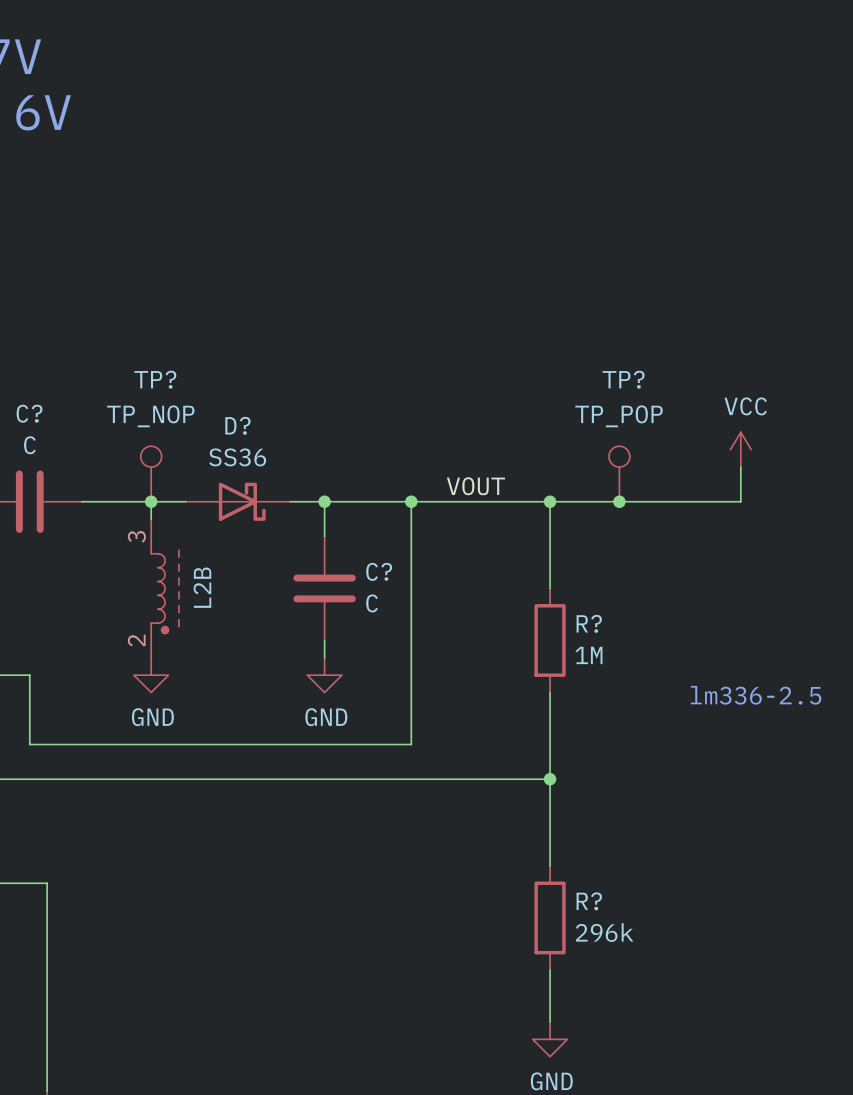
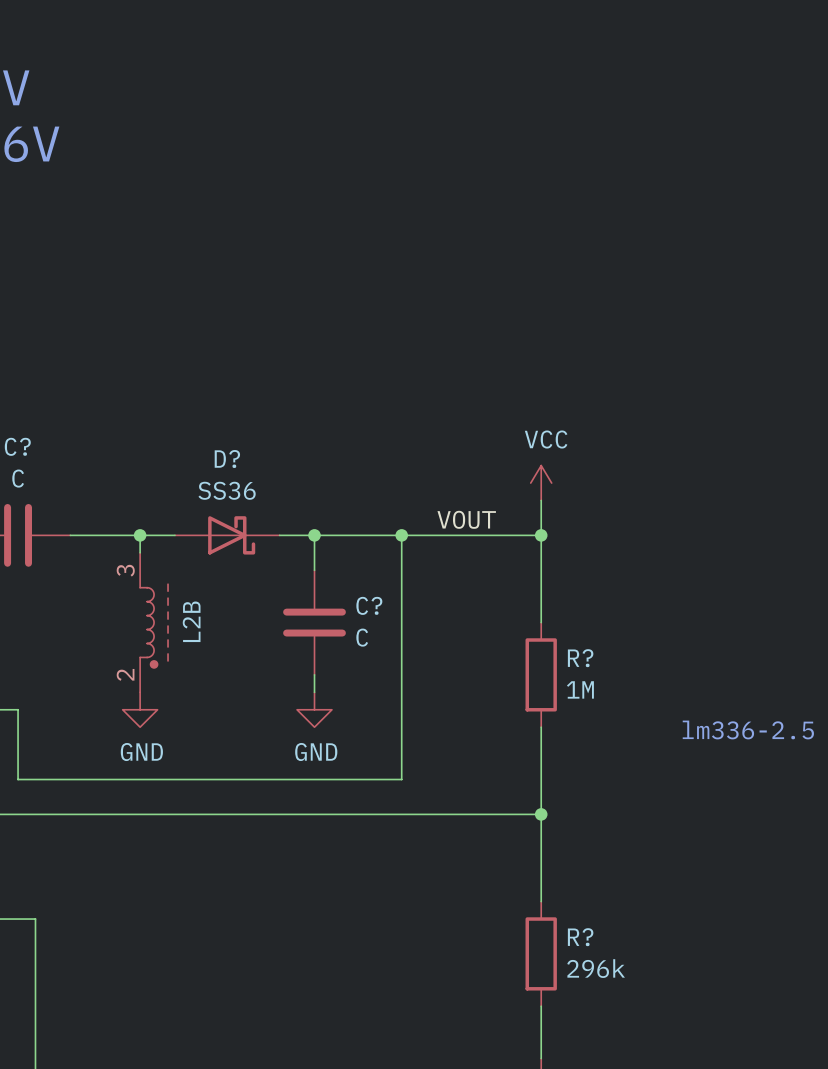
power symbol position: VCC (740, 449) -> VCC (541, 483)
wire: (740, 467) (740, 501) (550, 501) -> (541, 500) (541, 535)
TP?: TP_NOP (151, 474) -> none
TP?: TP_POP (619, 474) -> none
junction: (619, 501) -> none

